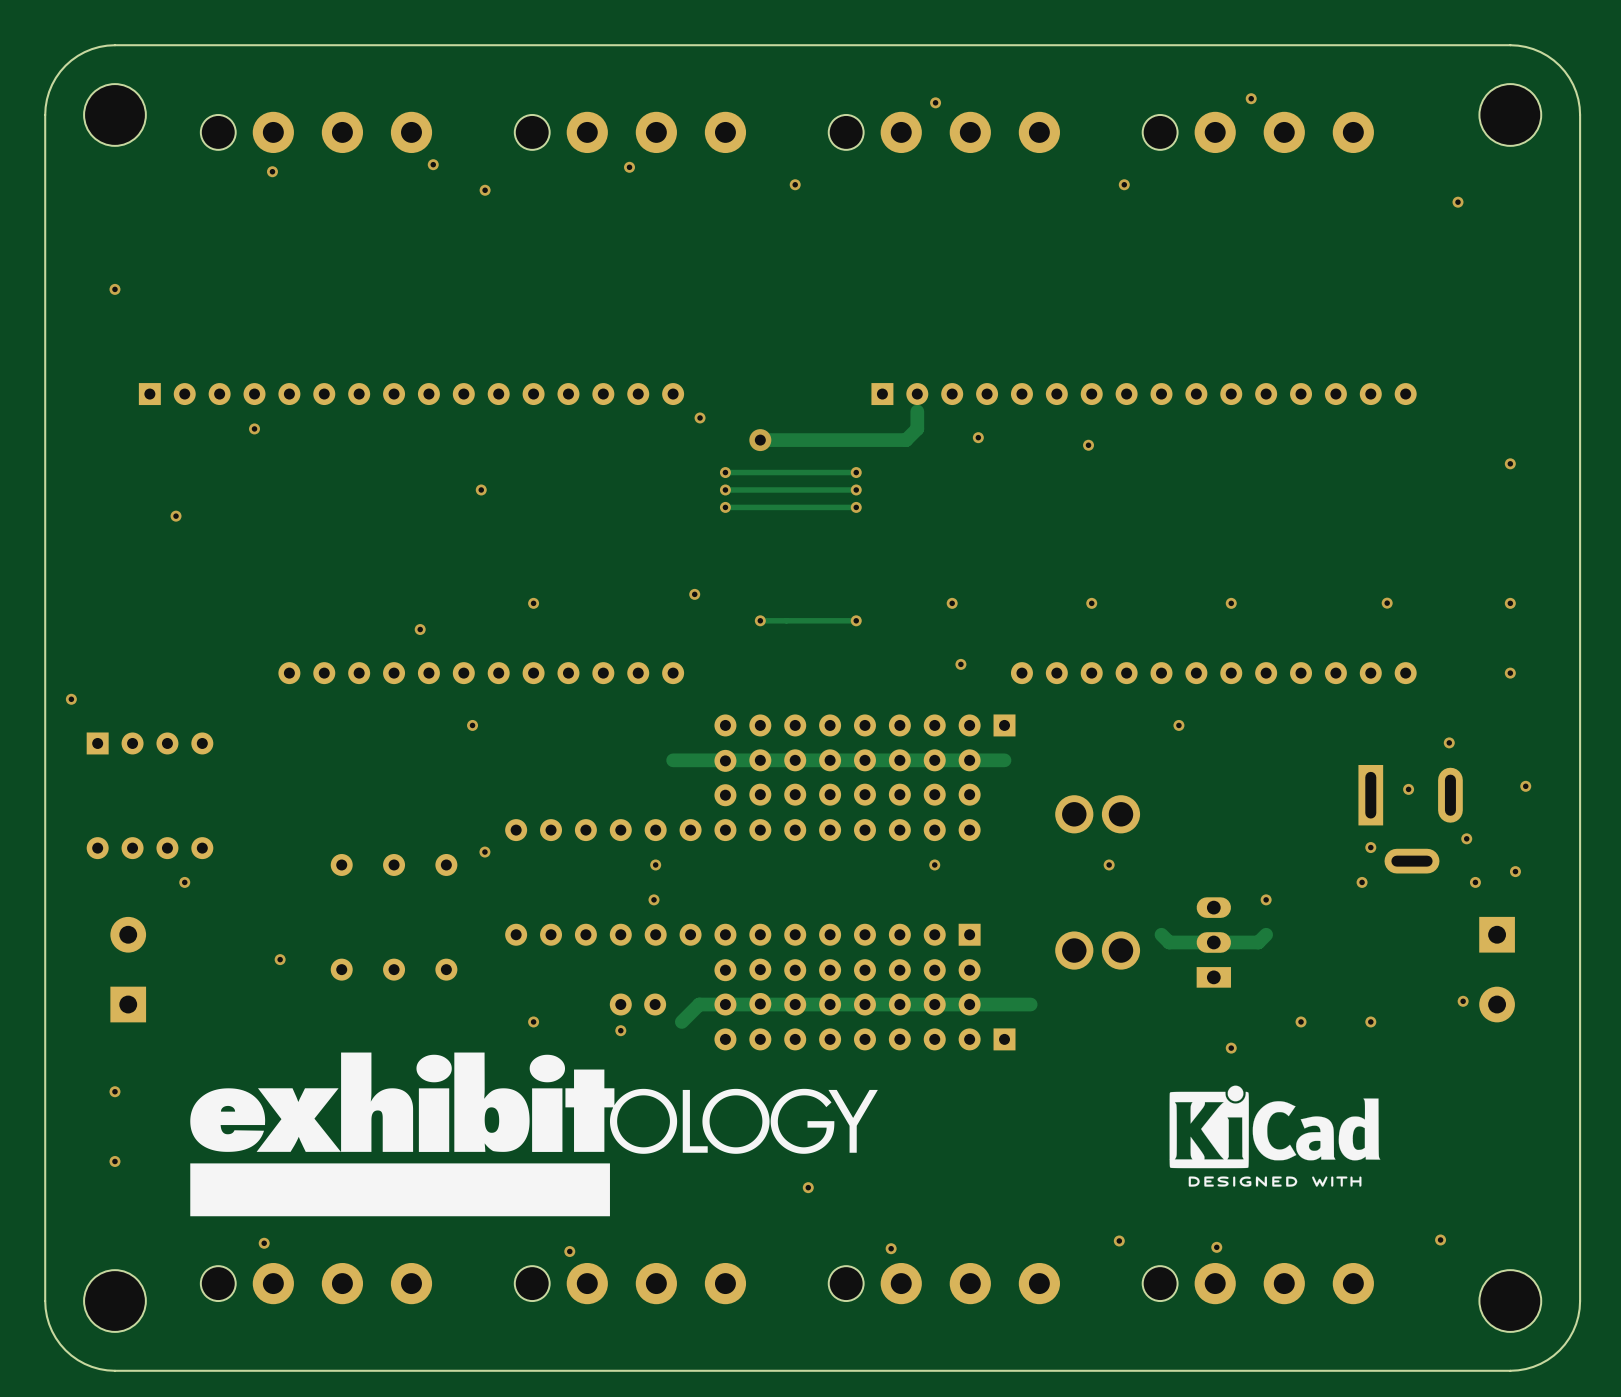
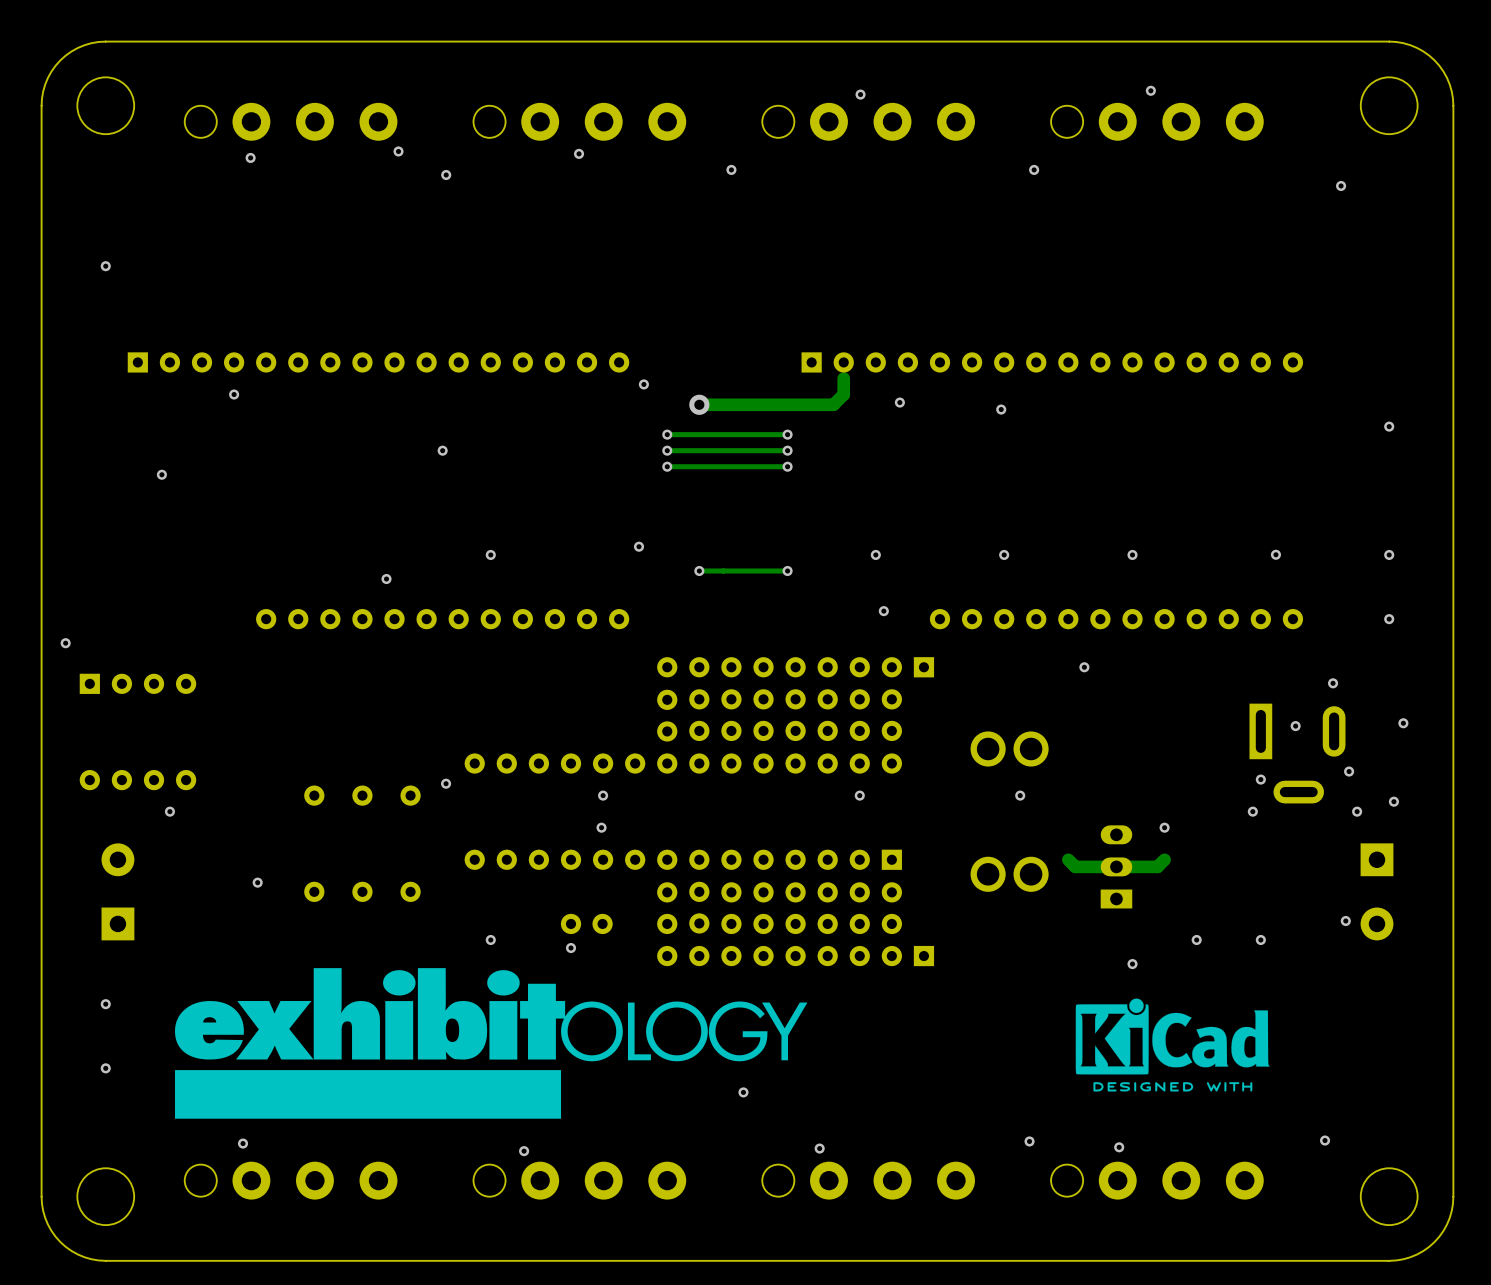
via: (472, 725) -> none
track: (1004, 760) (673, 760) -> none
track: (1030, 1004) (699, 1004) (681, 1021) -> none

